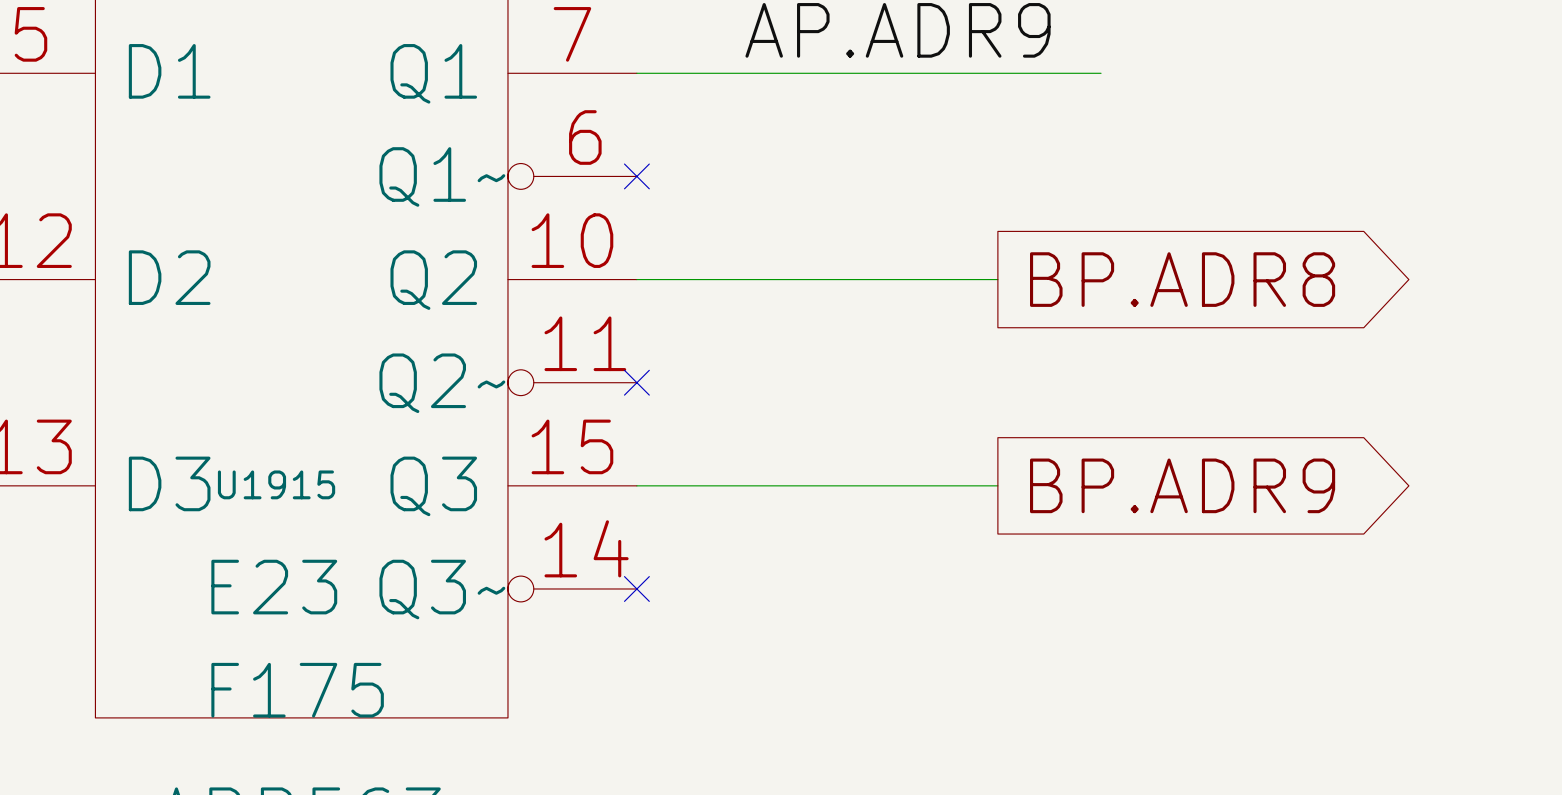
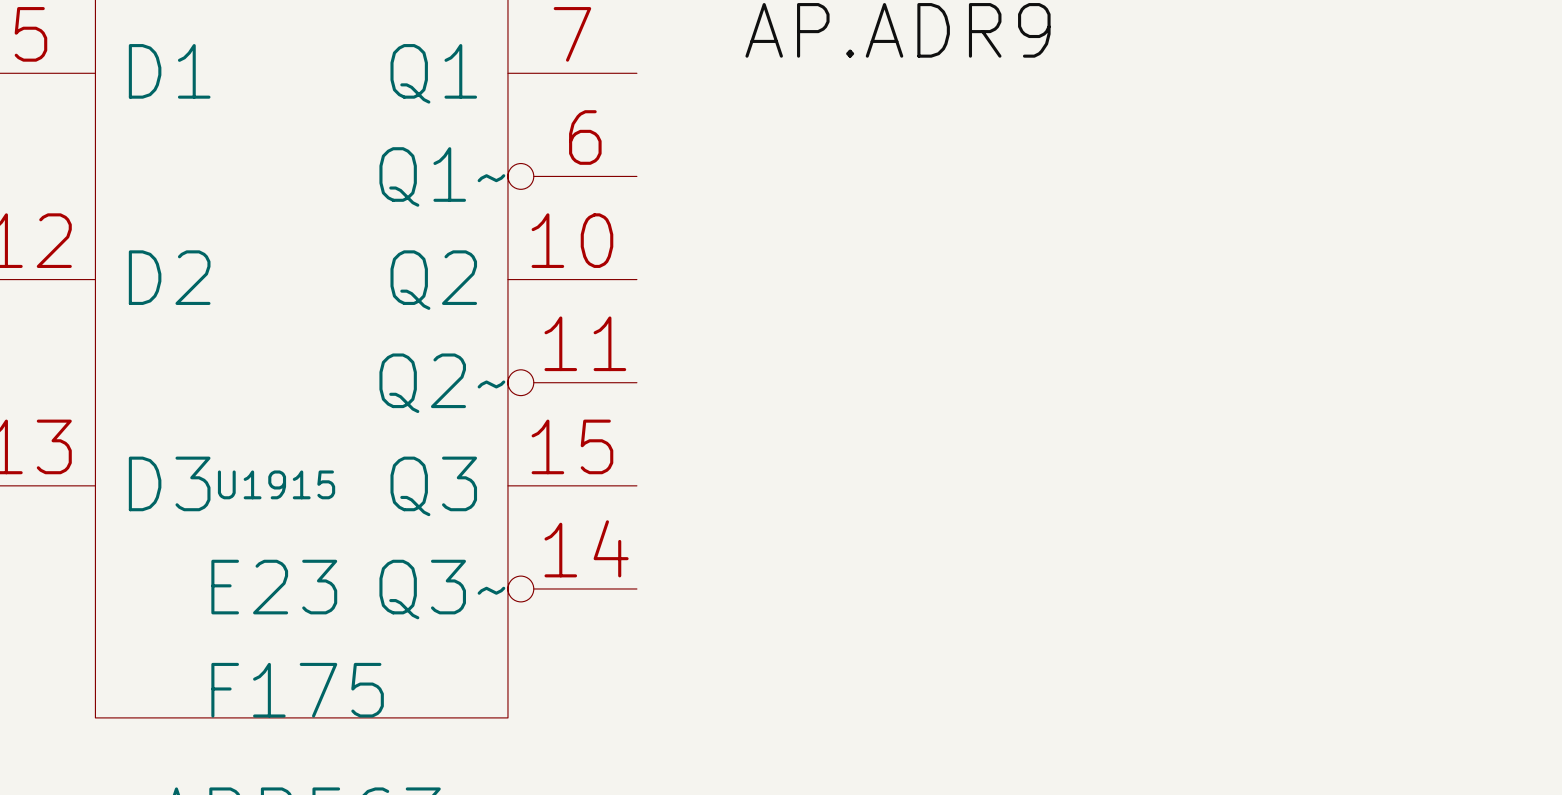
wire: (636, 73) (1101, 73) -> none
no-connect mark: (636, 176) -> none
wire: (636, 279) (997, 279) -> none
global label: BP.ADR8 (1182, 279) -> none
no-connect mark: (636, 382) -> none
wire: (636, 485) (997, 485) -> none
global label: BP.ADR9 (1182, 485) -> none
no-connect mark: (636, 588) -> none

